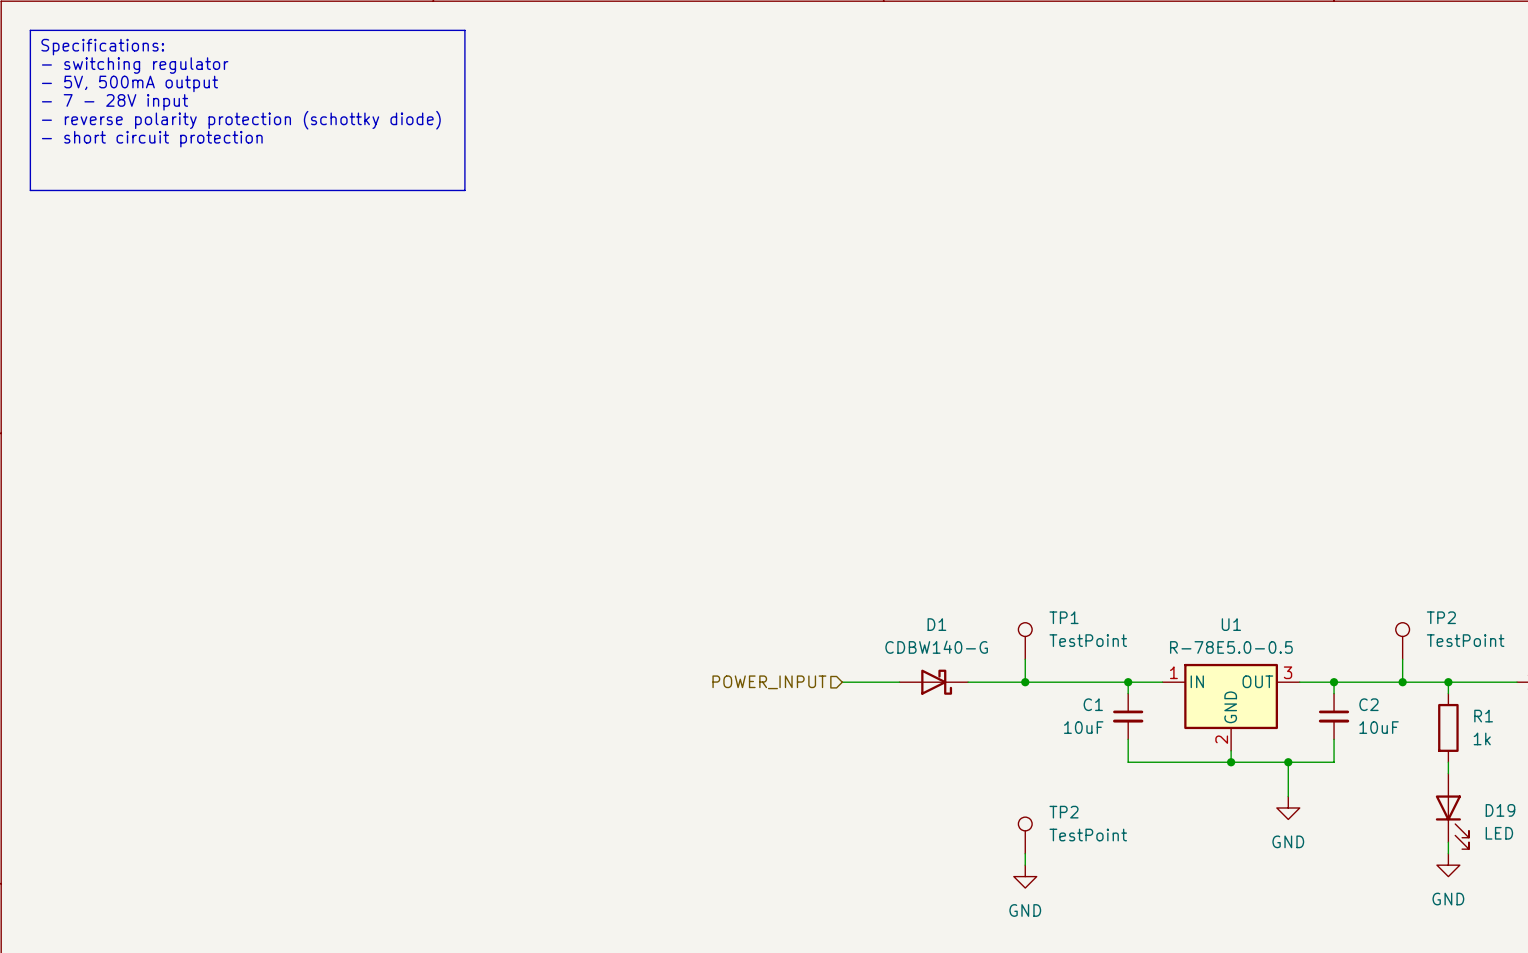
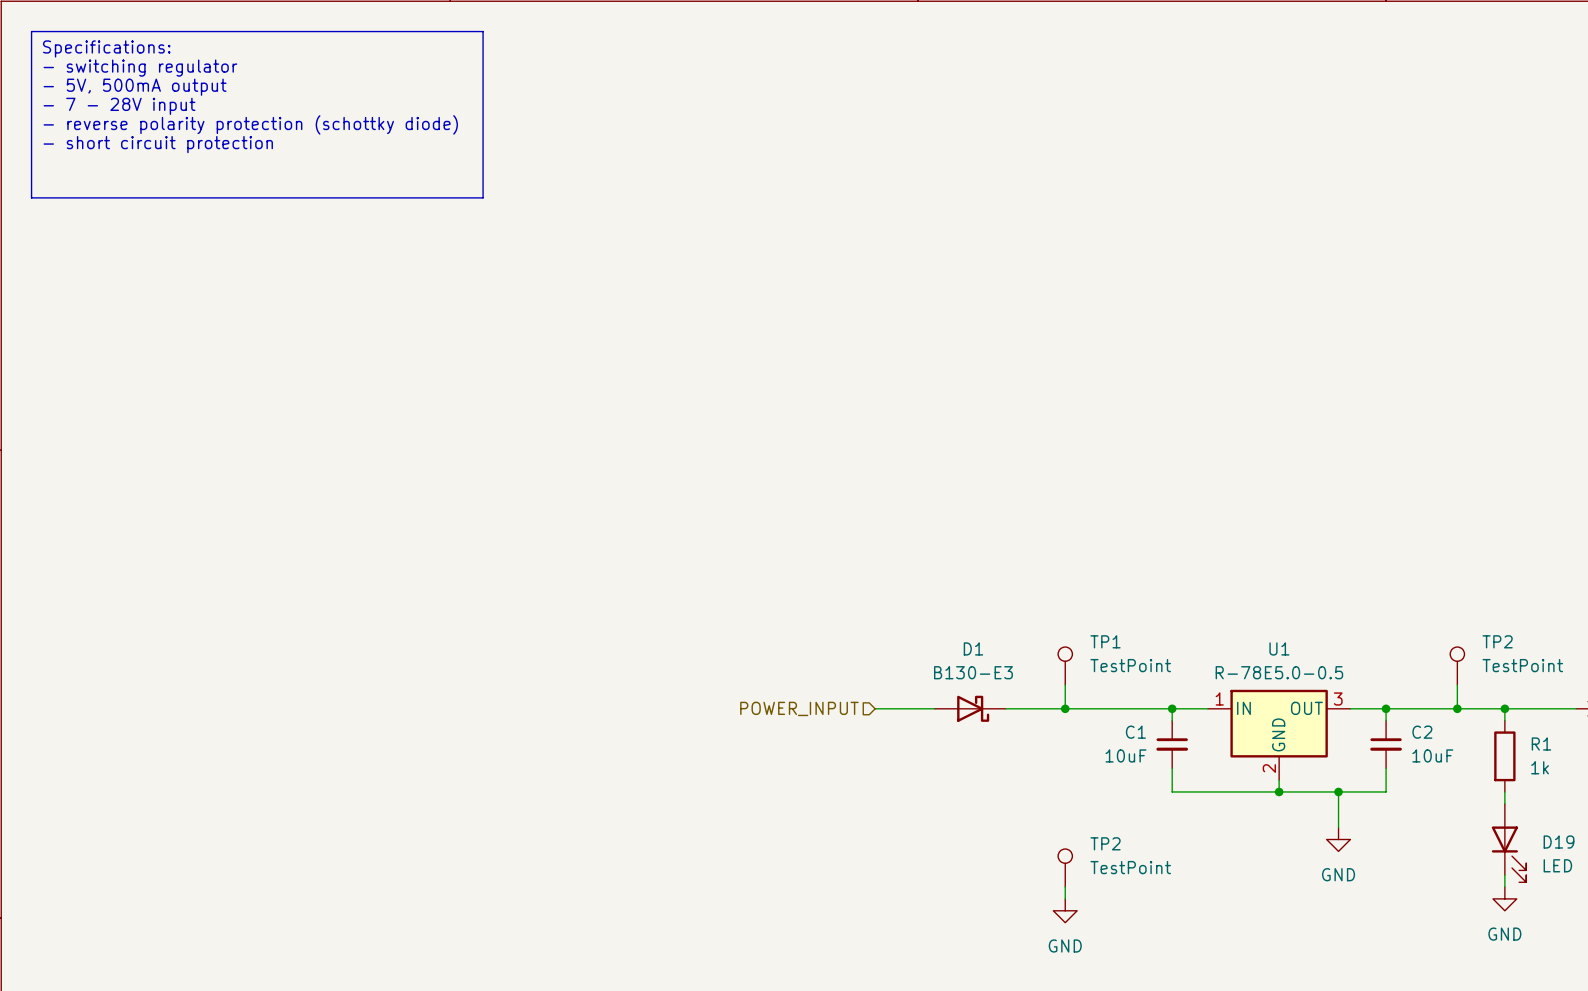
D1 value: CDBW140-G (936, 647) -> B130-E3 (973, 672)

